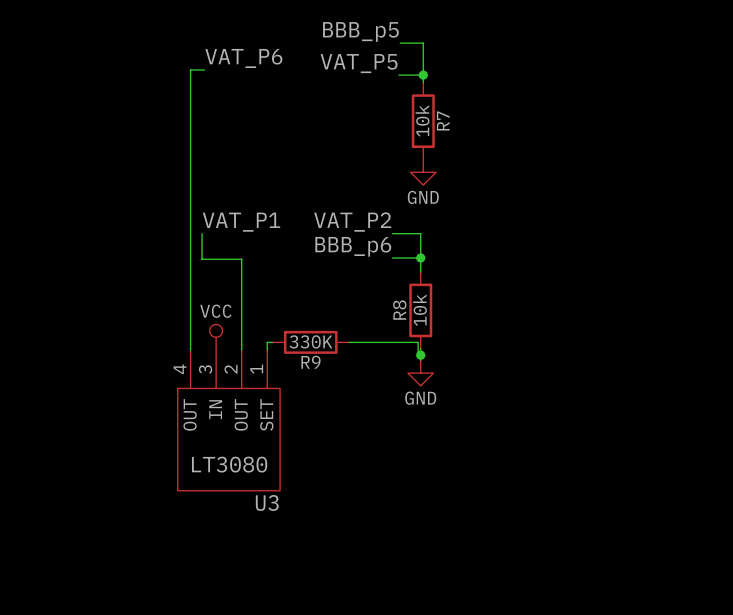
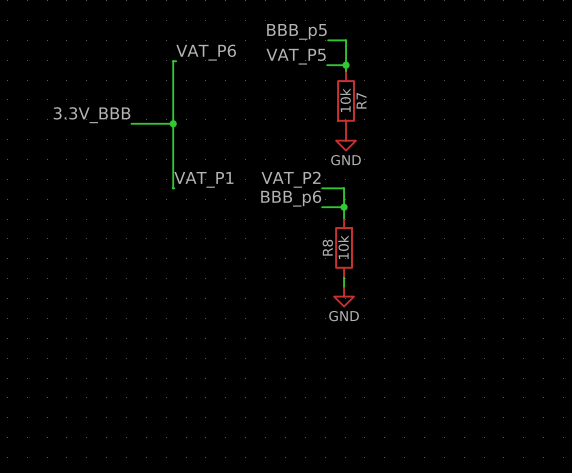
wire: (200, 69) (190, 69) (190, 350) -> (173, 61) (174, 188)
label: none -> 3.3V_BBB (92, 115)
wire: none -> (131, 123) (173, 123)
junction: none -> (173, 123)
wire: (202, 233) (202, 259) (241, 259) (241, 350) -> none
power symbol: VCC (216, 337) -> none
wire: (272, 342) (267, 342) (267, 350) -> none
R9: 330K (310, 342) -> none
wire: (349, 342) (418, 342) (418, 355) (420, 355) -> none
junction: (420, 355) -> none
U3: LT3080 (228, 420) -> none

